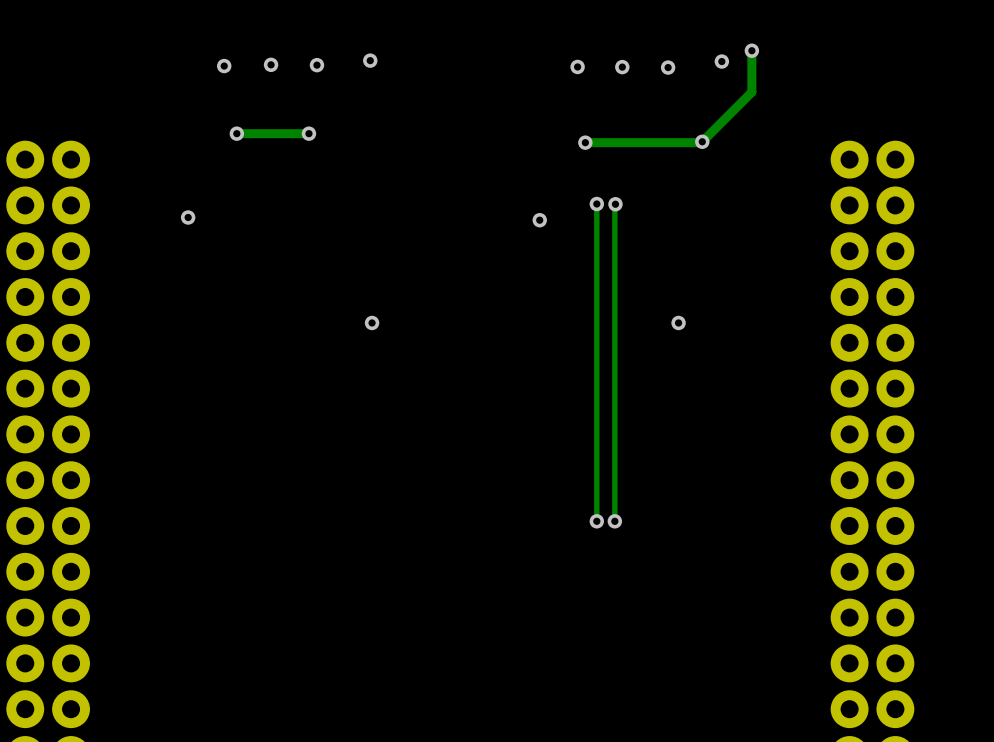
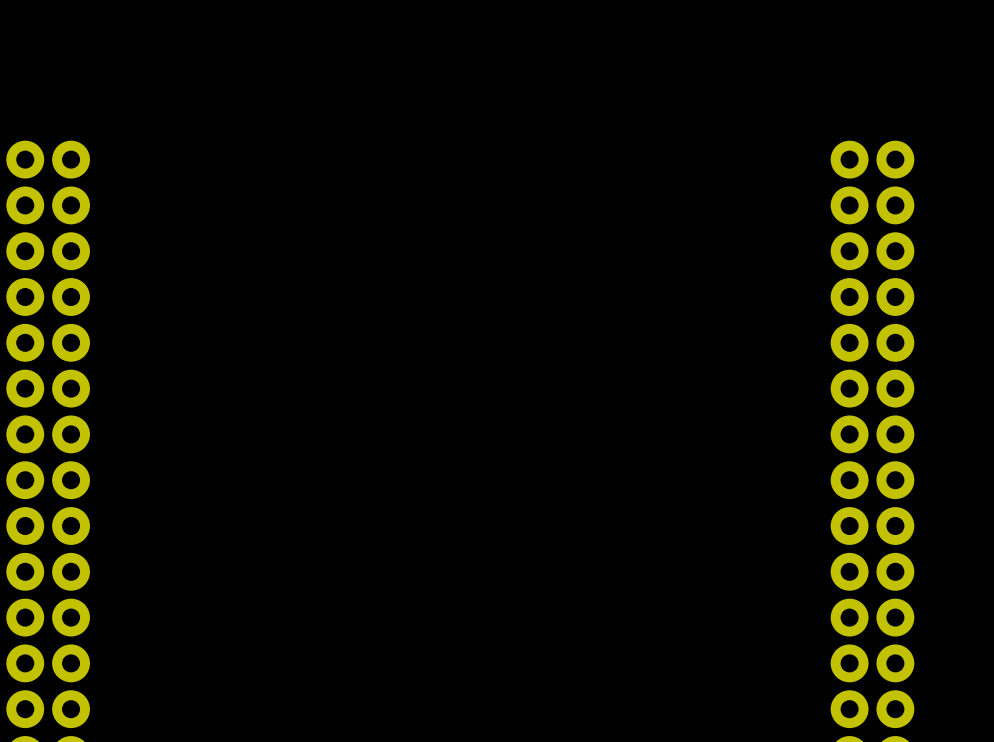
track: (751, 50) (751, 92) (701, 142) (585, 142) -> none
via: (751, 50) -> none
via: (370, 60) -> none
via: (721, 61) -> none
via: (271, 64) -> none
via: (316, 65) -> none
via: (224, 66) -> none
via: (577, 66) -> none
via: (622, 67) -> none
via: (668, 67) -> none
via: (236, 133) -> none
track: (308, 133) (236, 133) -> none
via: (308, 133) -> none
via: (702, 141) -> none
via: (585, 142) -> none
track: (596, 203) (596, 521) -> none
via: (596, 203) -> none
track: (615, 204) (614, 521) -> none
via: (615, 204) -> none
via: (188, 217) -> none
via: (539, 220) -> none
via: (372, 322) -> none
via: (678, 322) -> none
via: (596, 521) -> none
via: (614, 521) -> none

